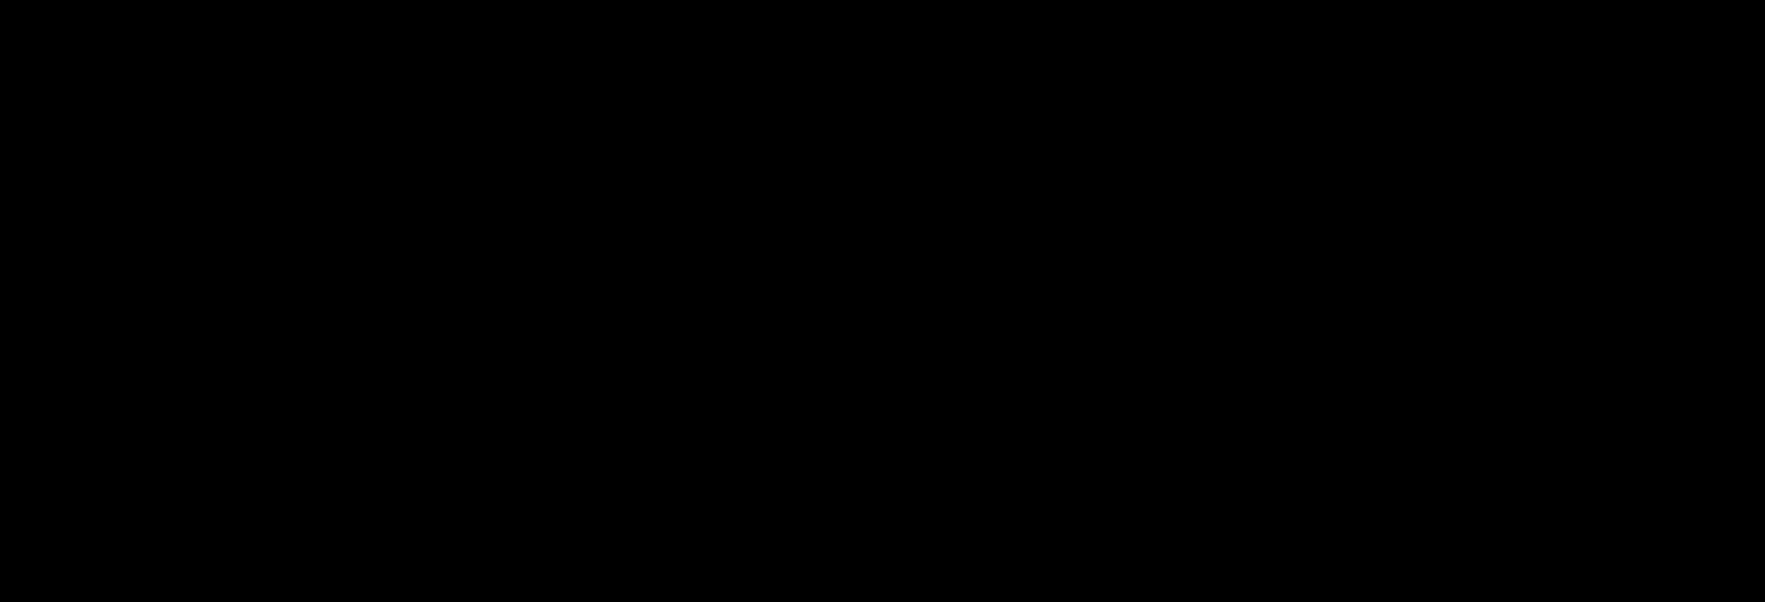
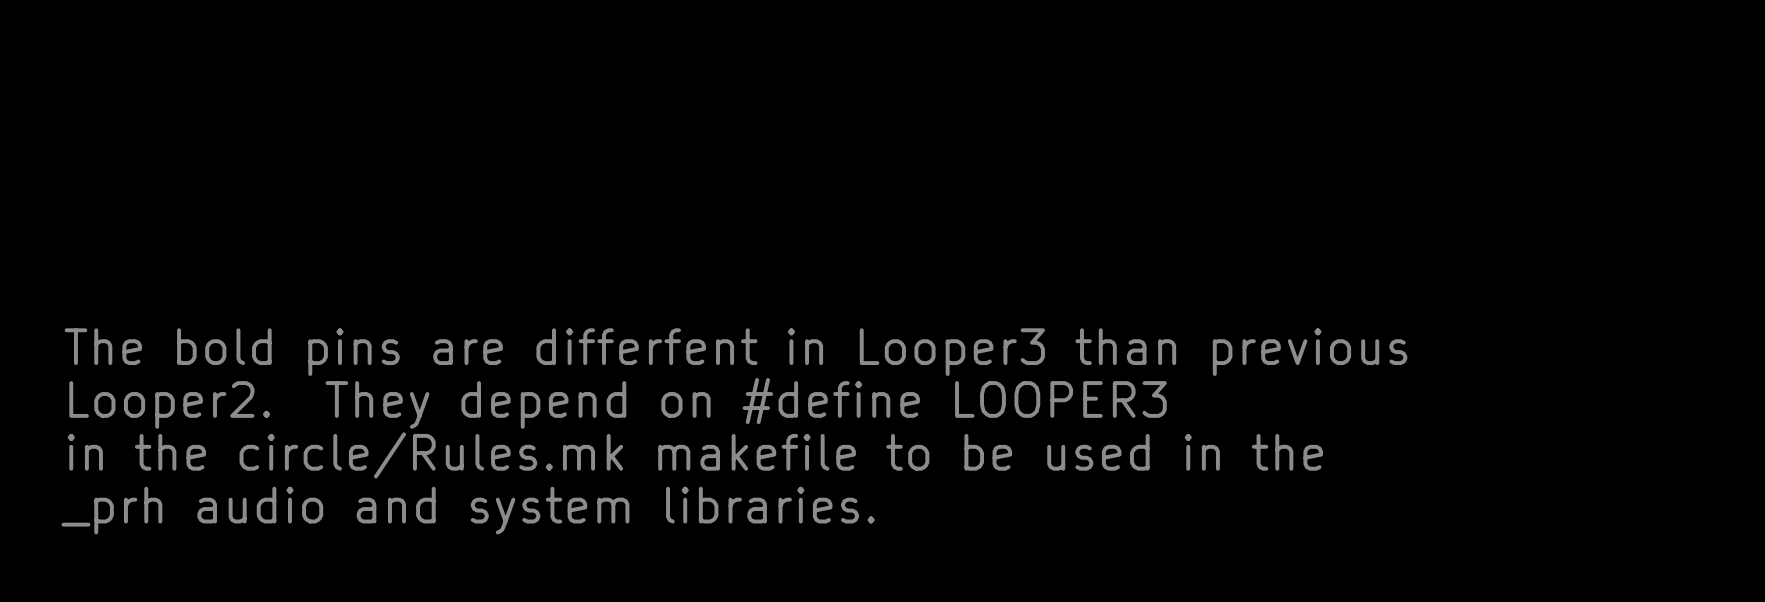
text: none -> The bold pins are differfent in Looper3 than previous (735, 352)
text: none -> Looper2. They depend on #define LOOPER3 (618, 403)
text: none -> in the circle/Rules.mk makefile to be used in the (695, 455)
text: none -> _prh audio and system libraries. (468, 510)

